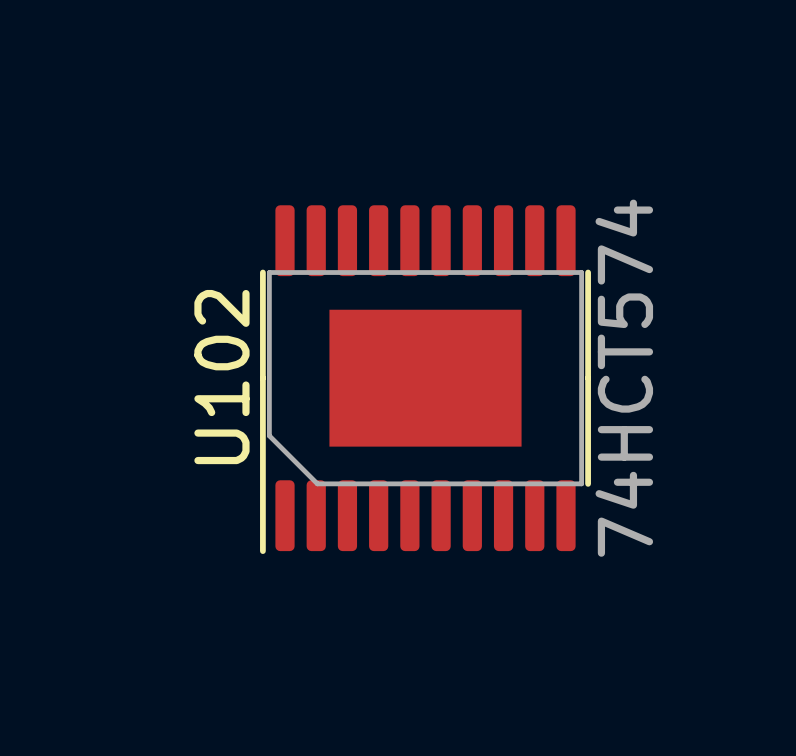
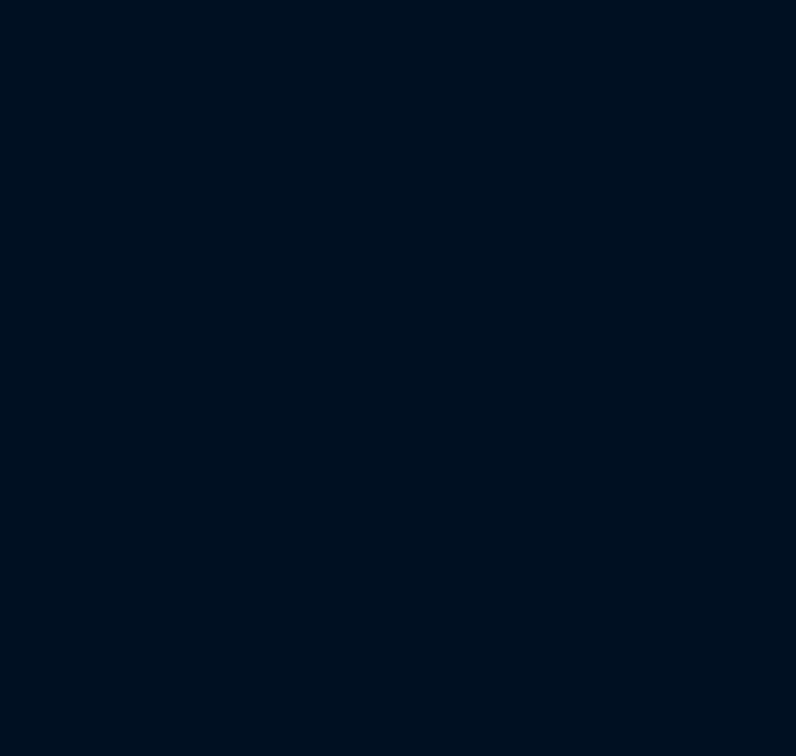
U102: 74HCT574 (425, 379) -> none

